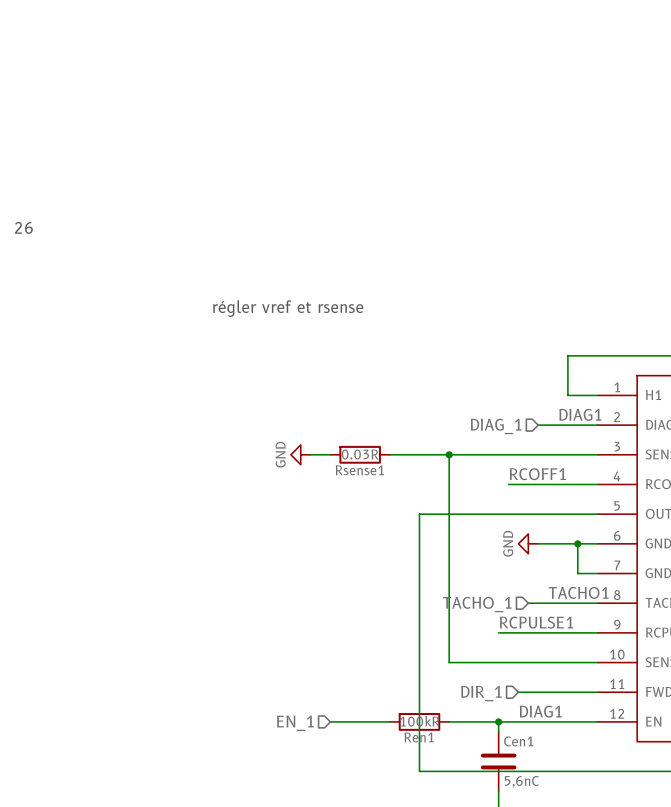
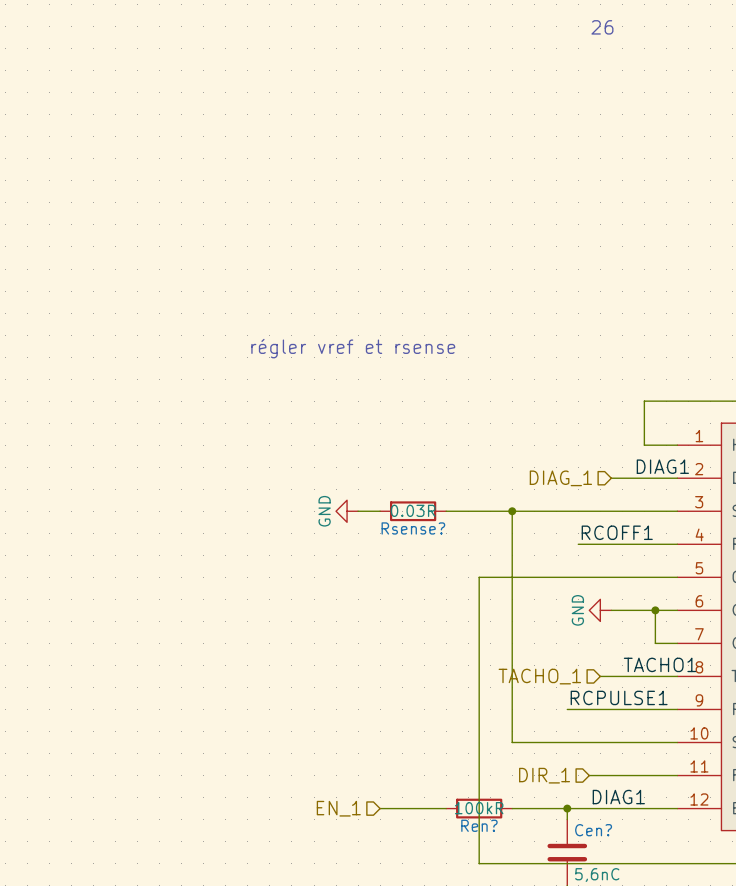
text: none -> 26 (602, 27)
text: 26 (23, 227) -> none
Rsense1 name: Rsense1 (359, 470) -> Rsense? (413, 528)
Ren1 name: Ren1 (419, 737) -> Ren? (479, 825)
Cen1 name: Cen1 (518, 741) -> Cen? (593, 830)

